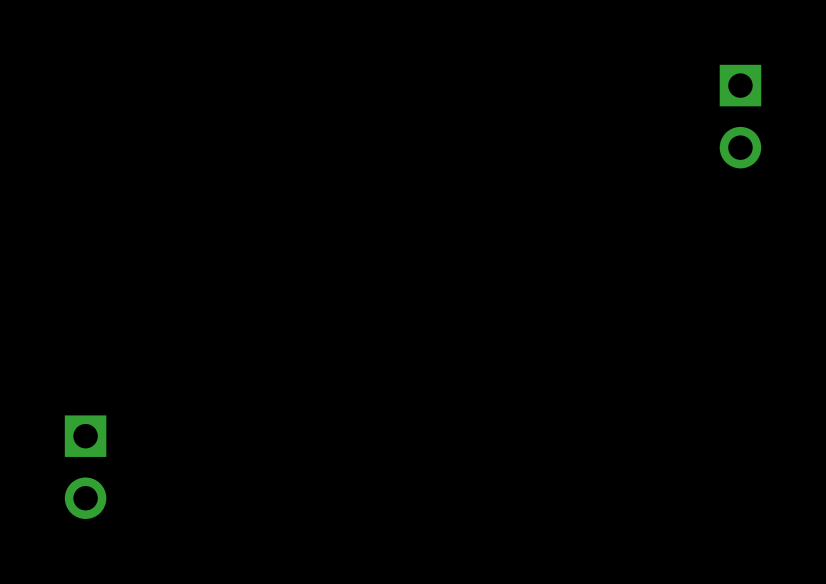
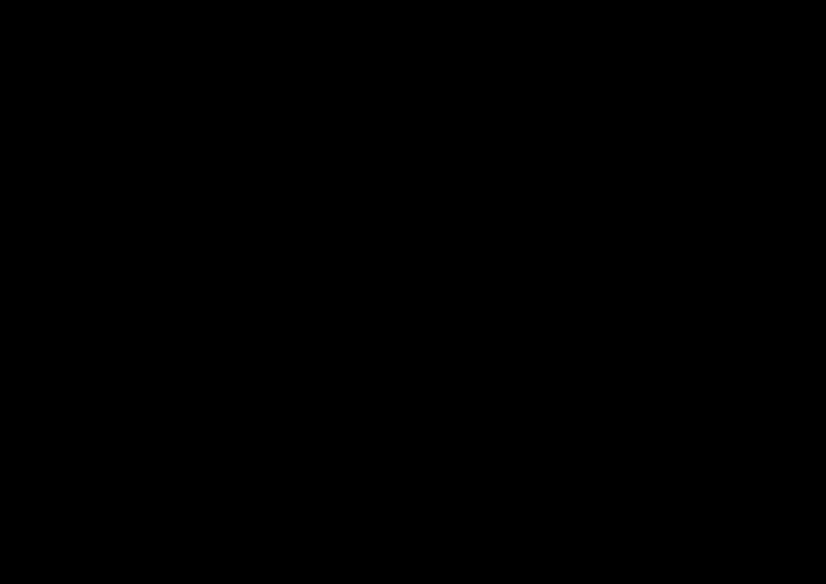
part: (740, 116) -> none
part: (85, 467) -> none

